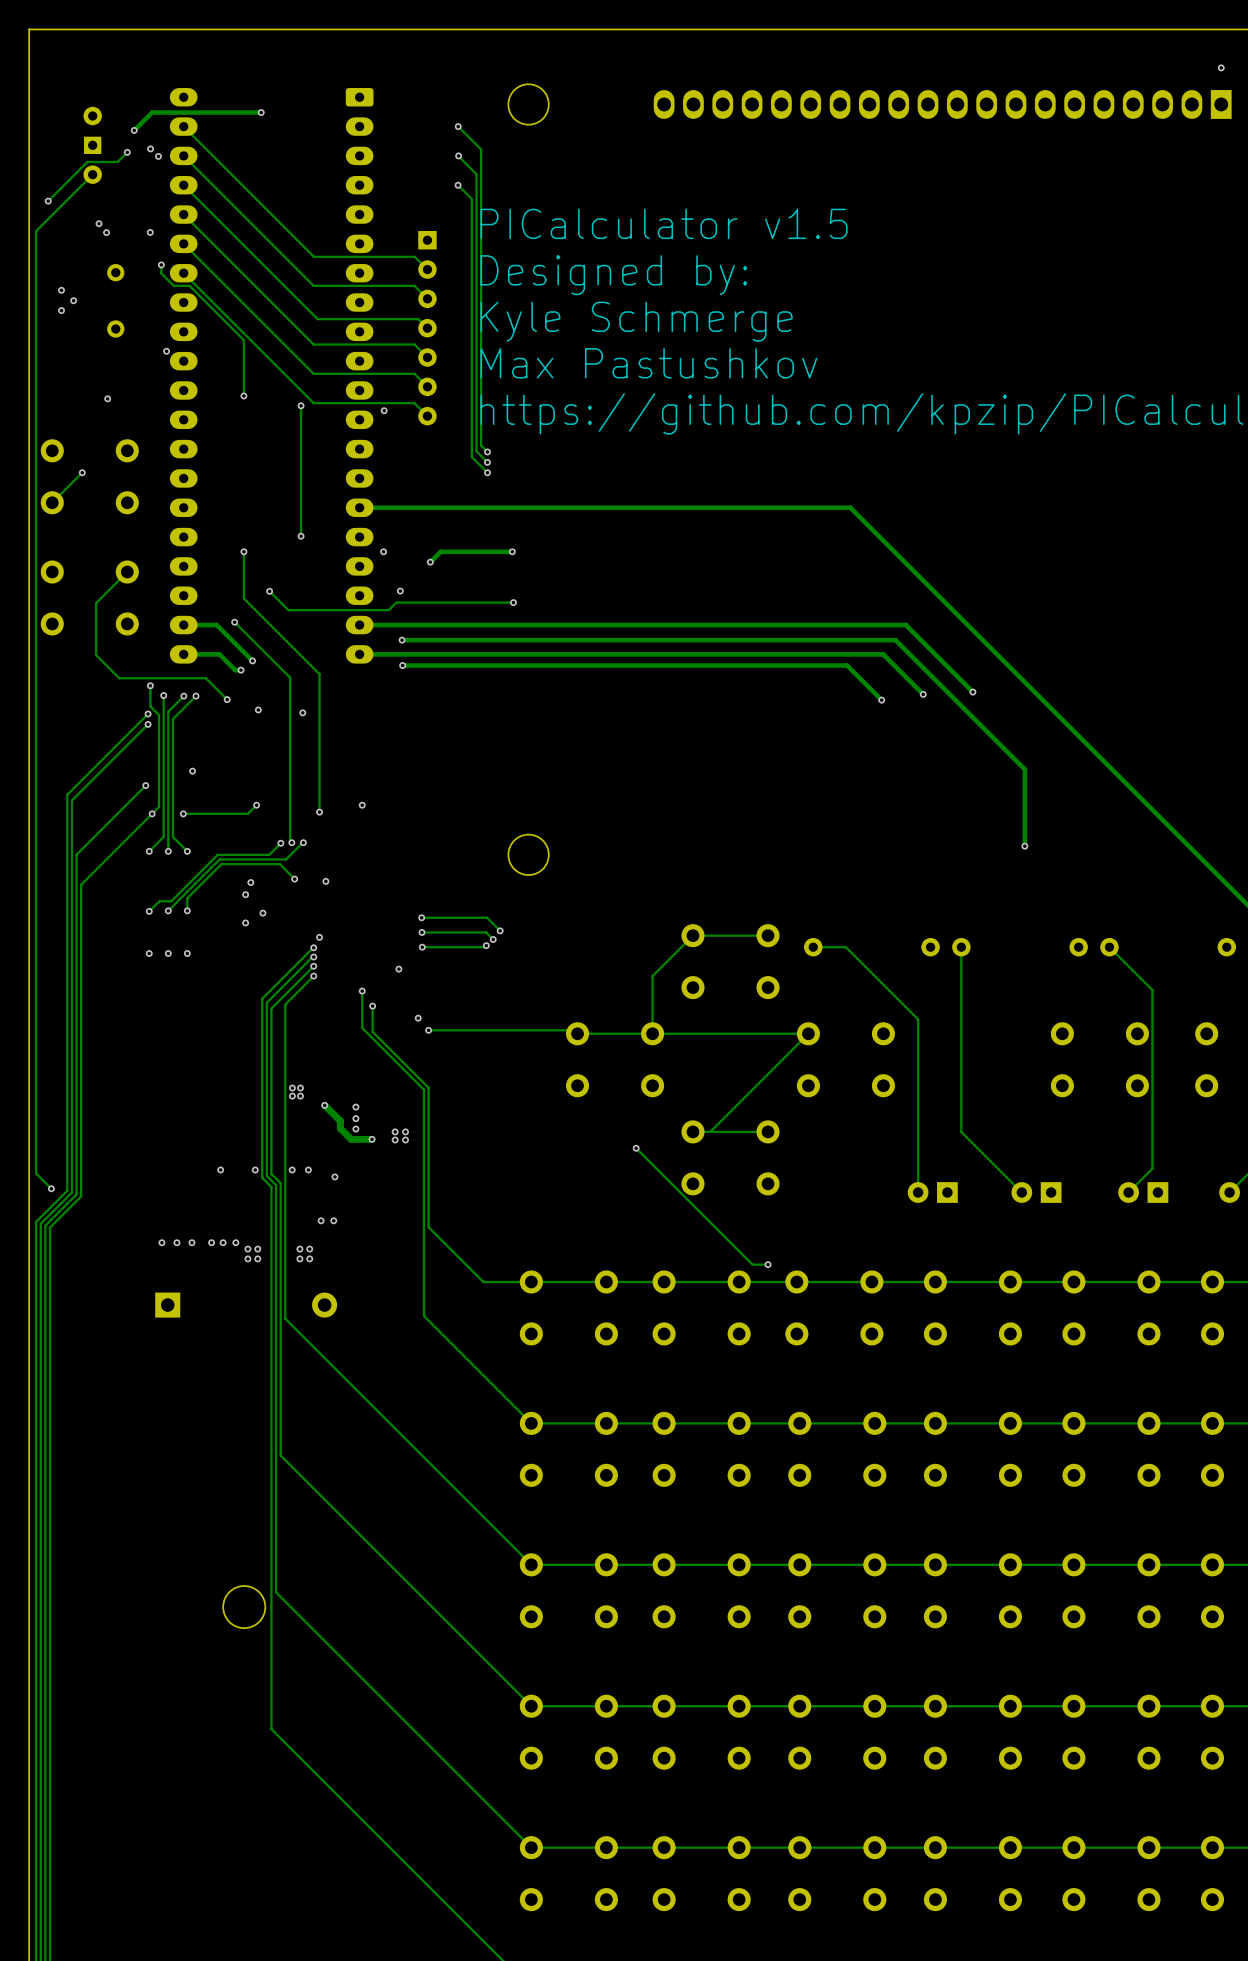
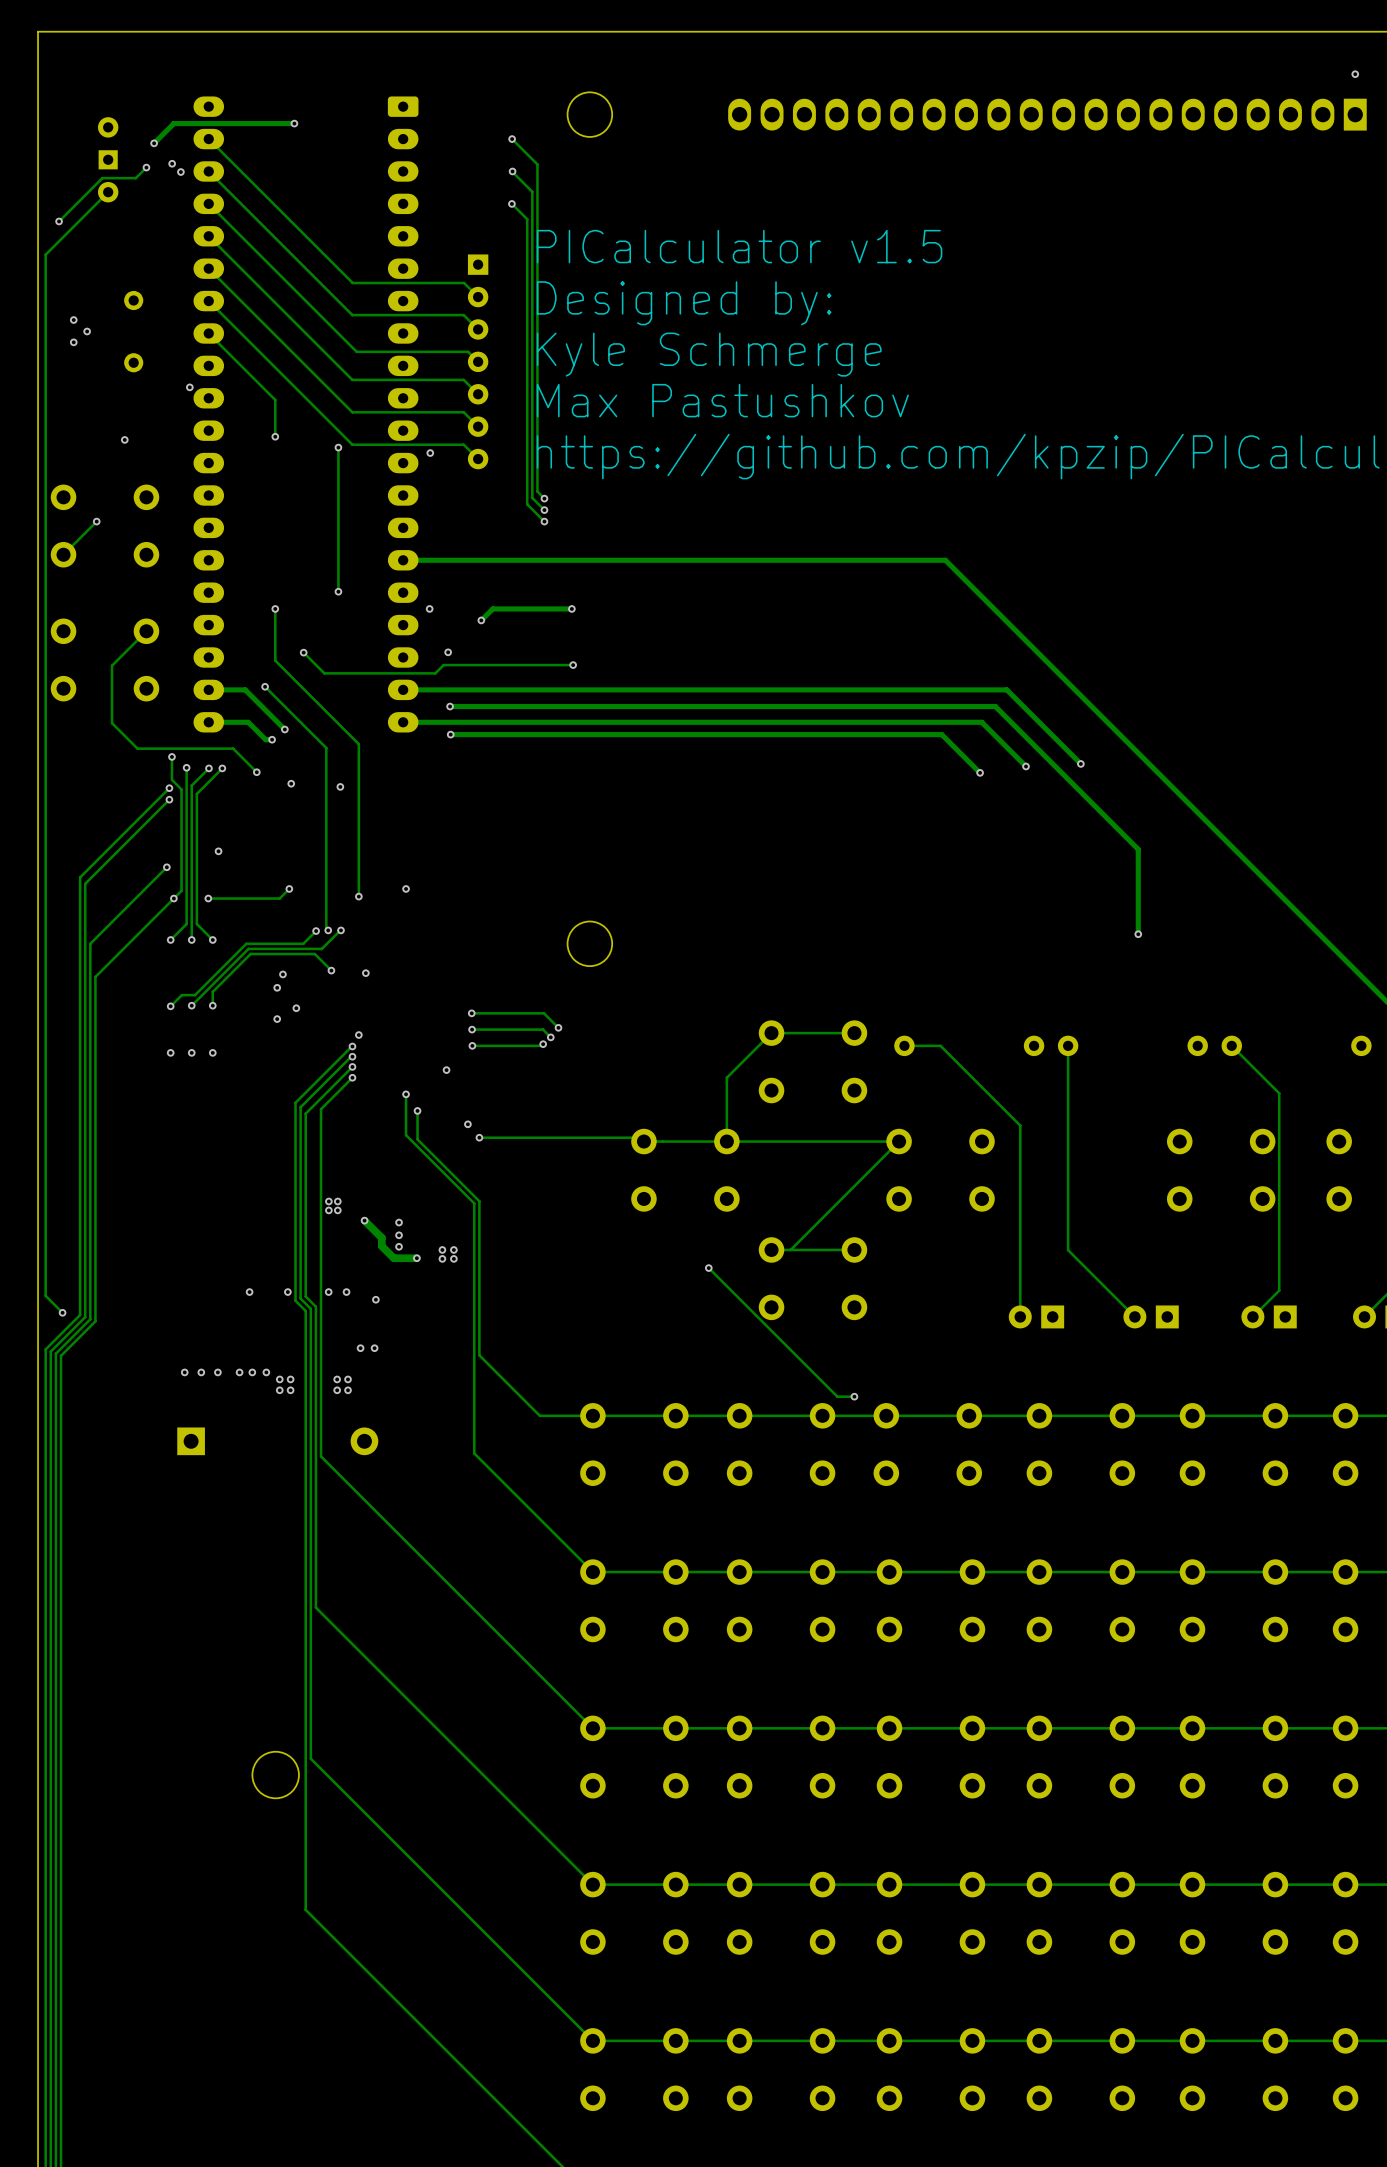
via: (99, 223) -> none
via: (106, 232) -> none
via: (150, 232) -> none
track: (161, 264) (161, 273) (173, 285) (189, 285) (243, 340) (243, 362) -> (208, 333) (275, 400)
via: (161, 264) -> none

